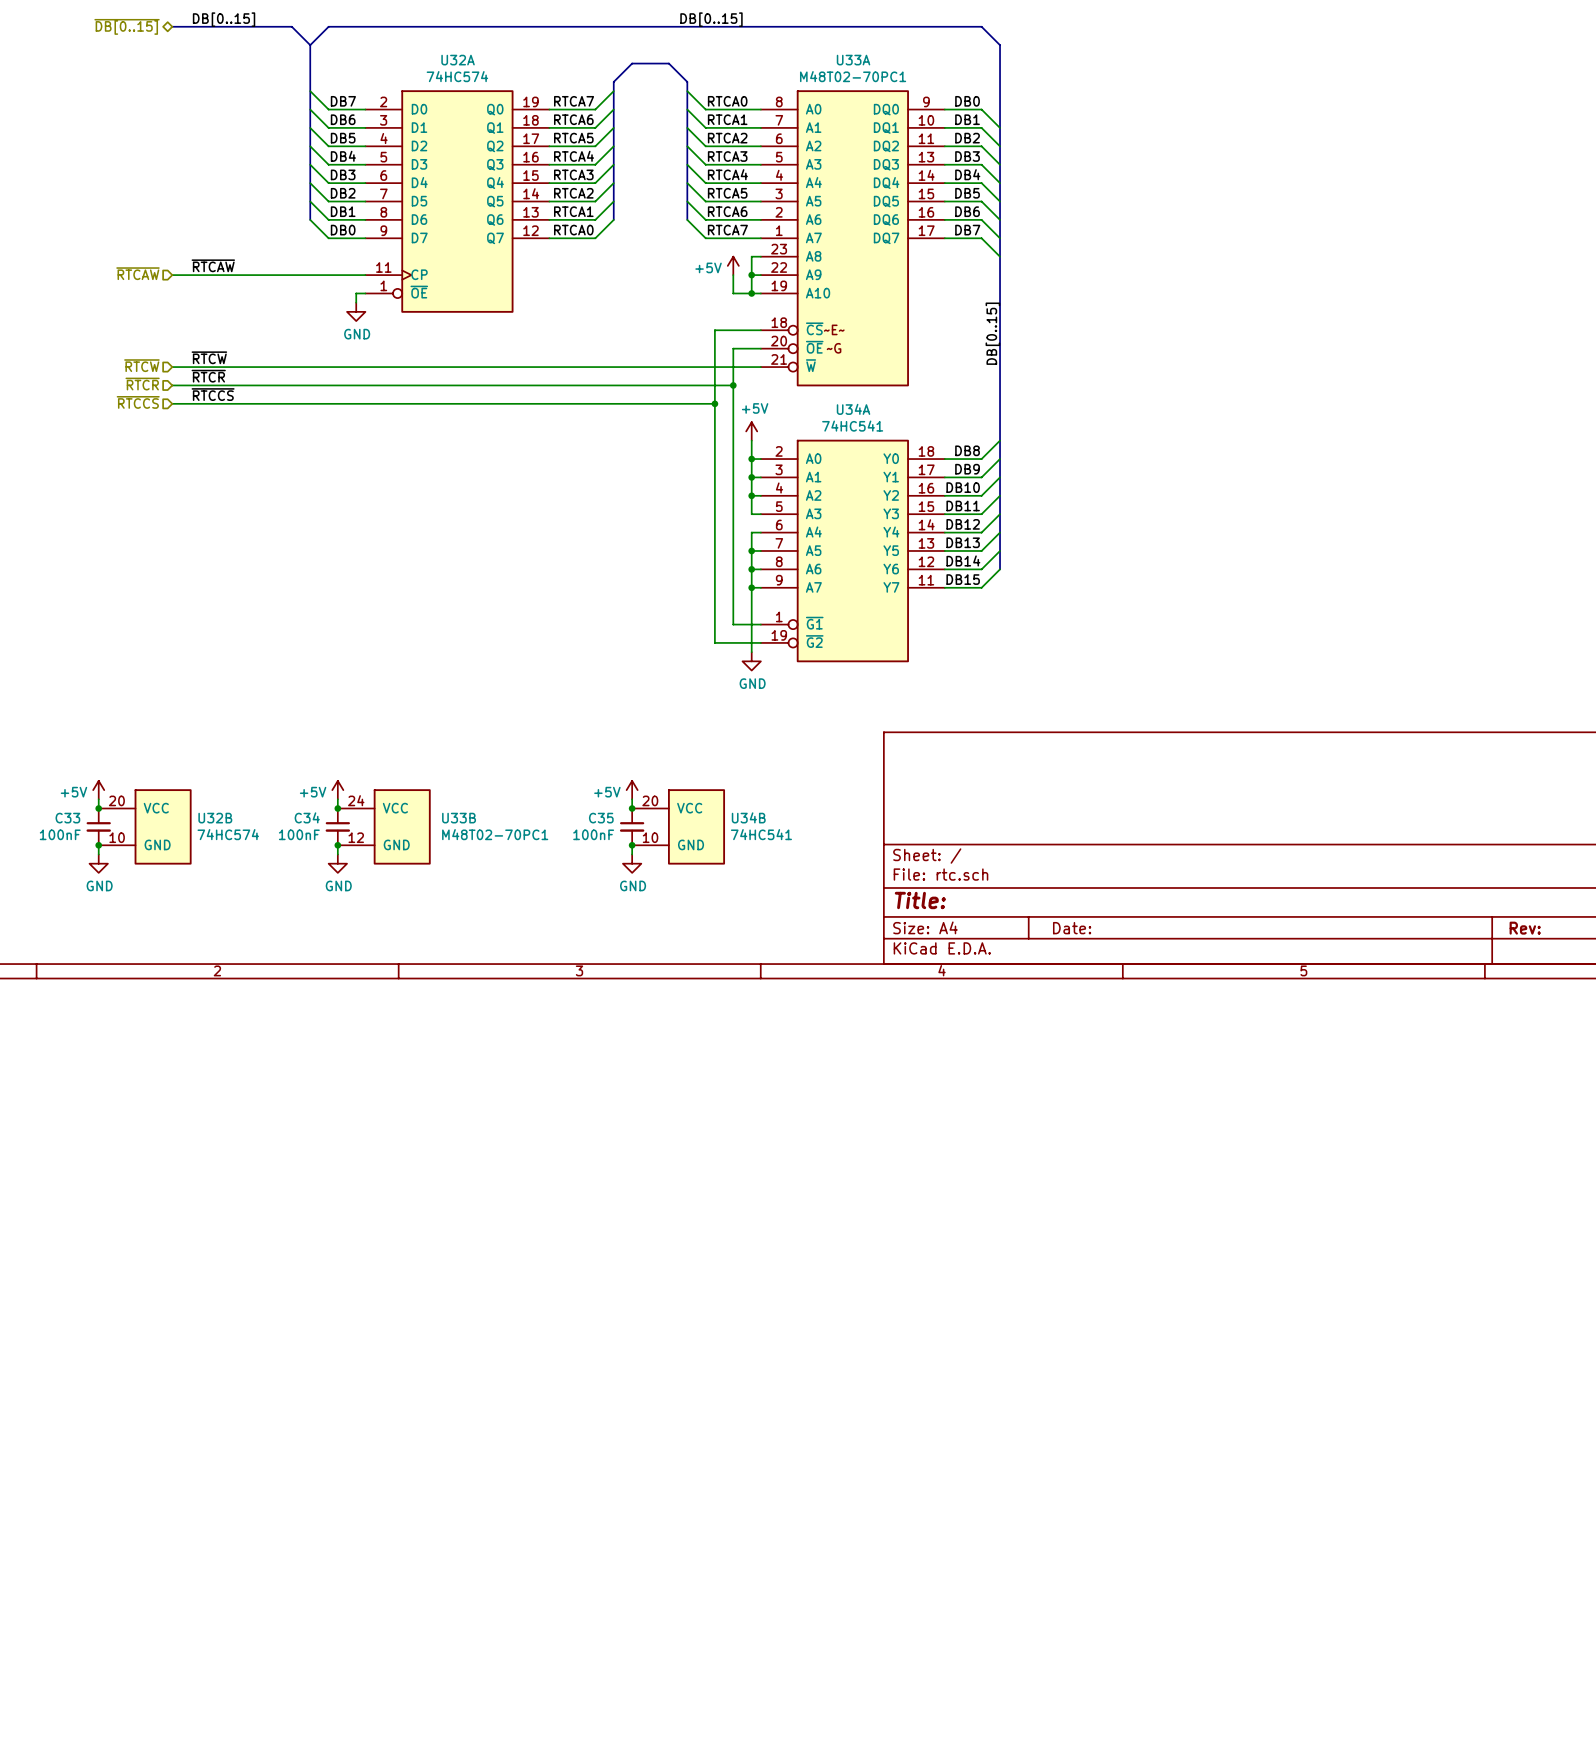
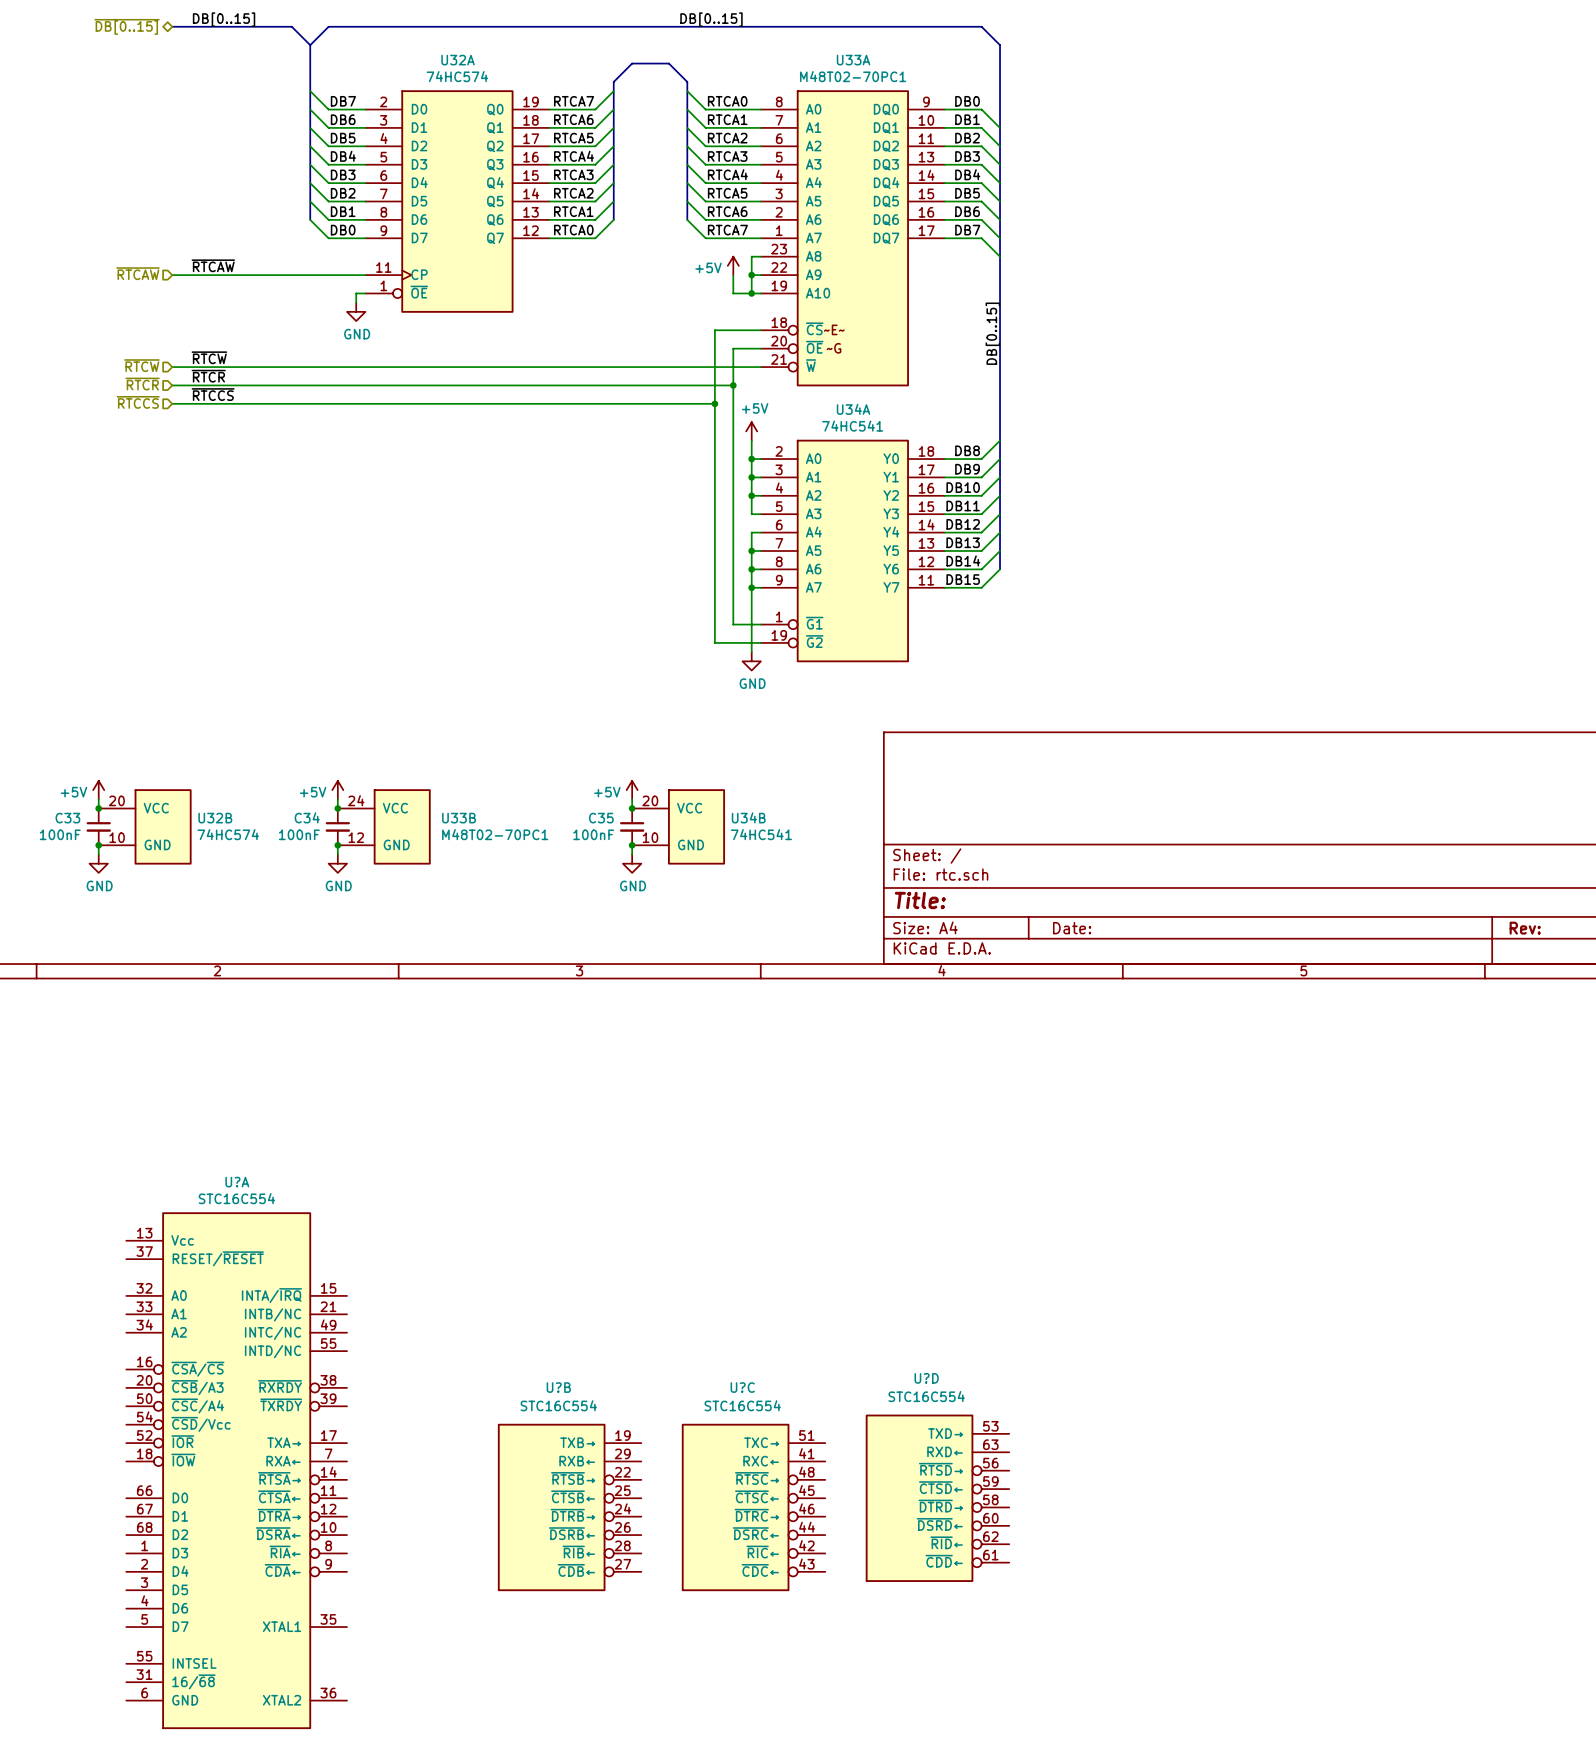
U?A: none -> STC16C554 (236, 1470)
U?D: none -> STC16C554 (937, 1498)
U?B: none -> STC16C554 (569, 1507)
U?C: none -> STC16C554 (753, 1507)

